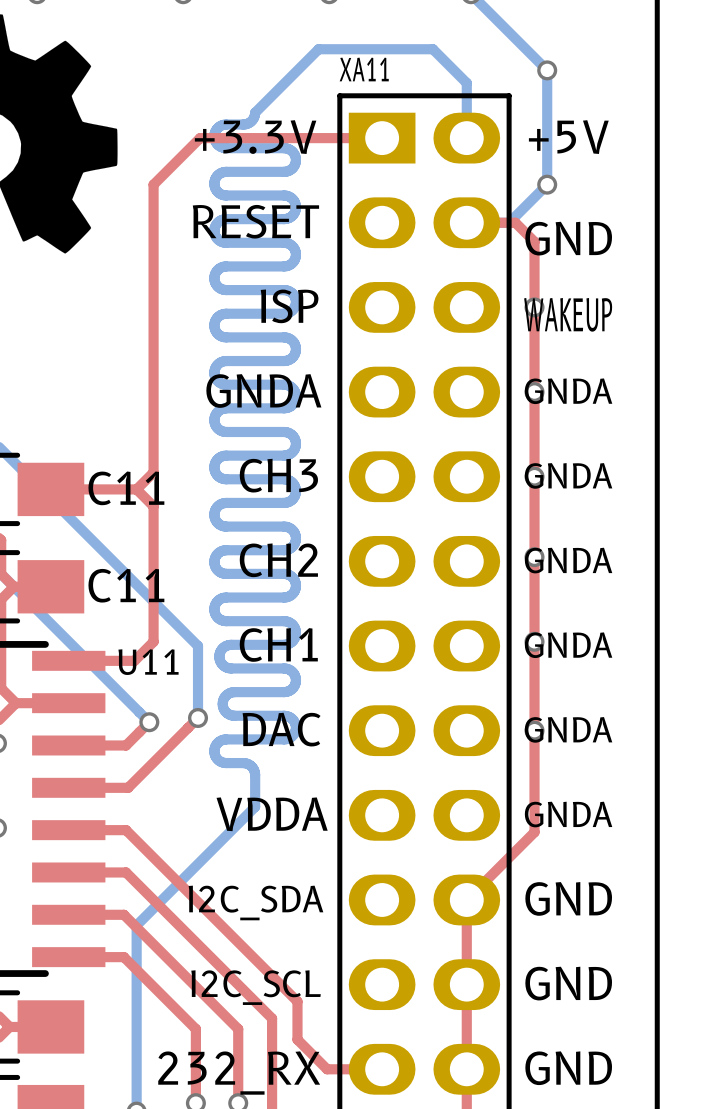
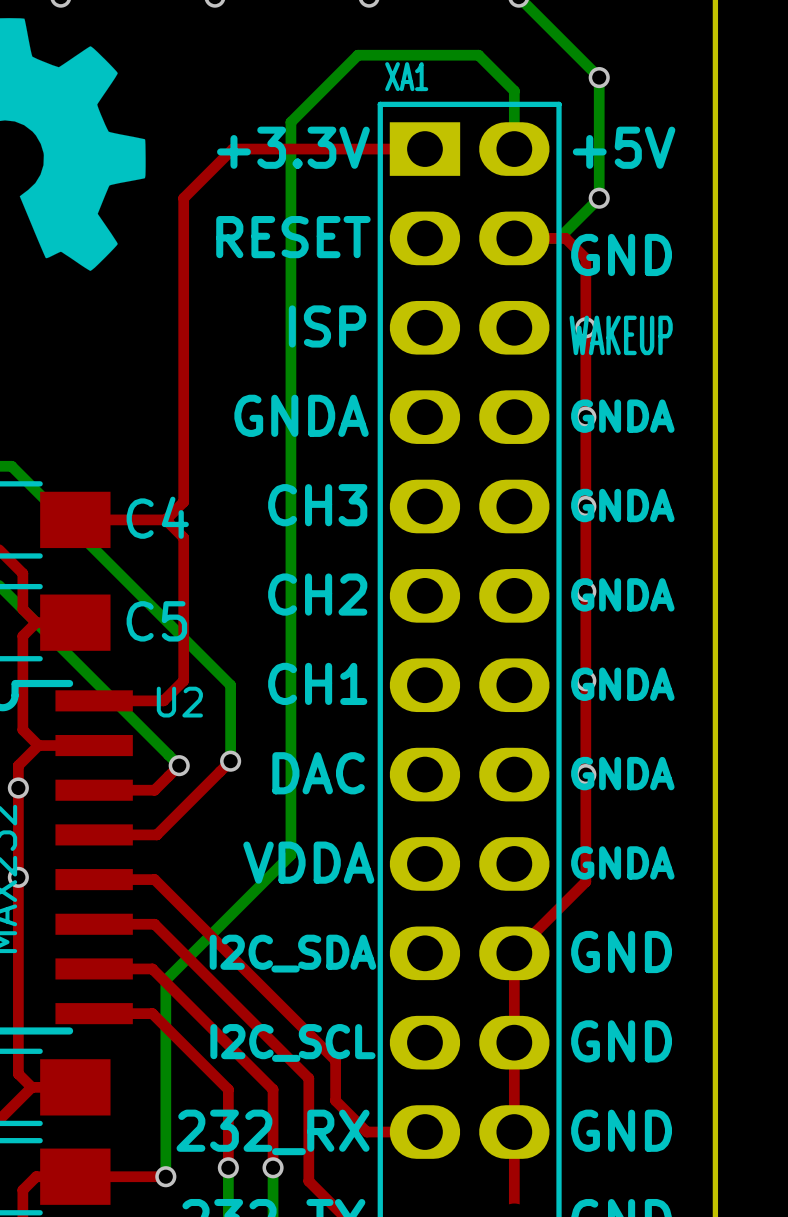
XA11 name: XA11 (364, 69) -> XA1 (406, 76)
bottom track: (255, 112) (253, 117) (248, 123) (221, 125) (215, 131) (214, 136) (216, 143) (223, 147) (286, 148) (293, 152) (295, 160) (293, 167) (286, 171) (223, 172) (216, 176) (214, 183) (216, 191) (223, 195) (286, 195) (293, 199) (295, 207) (293, 214) (286, 218) (223, 219) (216, 223) (214, 230) (216, 238) (223, 242) (286, 243) (293, 247) (295, 254) (293, 261) (286, 266) (223, 266) (216, 270) (214, 278) (216, 285) (223, 289) (286, 290) (293, 294) (295, 301) (293, 309) (286, 313) (223, 314) (216, 318) (214, 325) (216, 332) (223, 337) (286, 337) (293, 341) (295, 349) (293, 356) (286, 360) (223, 361) (216, 365) (214, 372) (216, 380) (223, 384) (286, 384) (293, 389) (295, 396) (293, 403) (286, 408) (223, 408) (216, 412) (214, 420) (216, 427) (223, 431) (286, 432) (291, 434) (295, 441) (294, 448) (286, 455) (223, 455) (218, 458) (214, 464) (215, 472) (223, 478) (286, 479) (291, 481) (295, 488) (294, 496) (286, 502) (223, 503) (218, 505) (214, 512) (215, 519) (223, 526) (286, 526) (291, 529) (295, 535) (294, 543) (286, 549) (223, 550) (218, 552) (214, 559) (215, 567) (223, 573) (286, 574) (291, 576) (295, 583) (294, 590) (286, 597) (223, 597) (218, 600) (214, 606) (215, 614) (223, 620) (286, 621) (291, 623) (295, 630) (294, 638) (286, 644) (228, 645) (223, 647) (219, 654) (220, 661) (228, 668) (286, 668) (291, 671) (295, 677) (294, 685) (286, 691) (234, 692) (229, 693) (223, 698) (223, 709) (231, 715) (284, 715) (289, 716) (294, 722) (294, 732) (286, 739) (226, 739) (216, 743) (214, 753) (218, 760) (223, 762) (248, 764) (253, 769) (255, 774) -> (290, 122) (290, 821)
C11 name: C11 (126, 488) -> C4 (157, 517)
C11 name: C11 (126, 585) -> C5 (156, 621)
U11 name: U11 (148, 662) -> U2 (179, 702)

